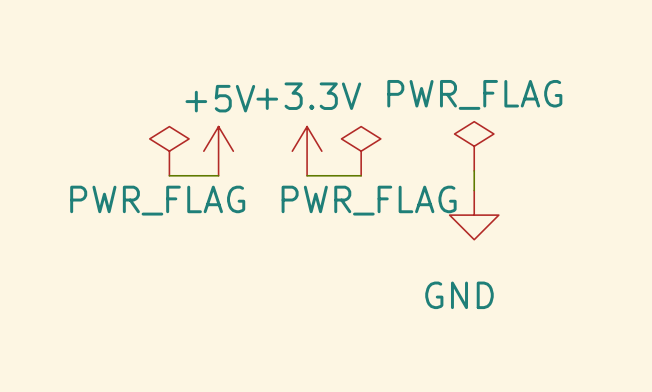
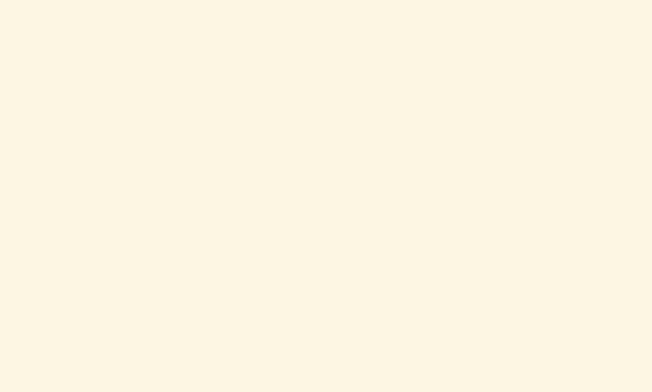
power symbol: PWR_FLAG (474, 146) -> none
power symbol: PWR_FLAG (169, 151) -> none
power symbol: +5V (218, 151) -> none
power symbol: +3.3V (307, 151) -> none
power symbol: PWR_FLAG (361, 151) -> none
wire: (474, 170) (474, 190) -> none
wire: (169, 175) (218, 175) -> none
wire: (307, 175) (361, 175) -> none
power symbol: GND (474, 215) -> none

